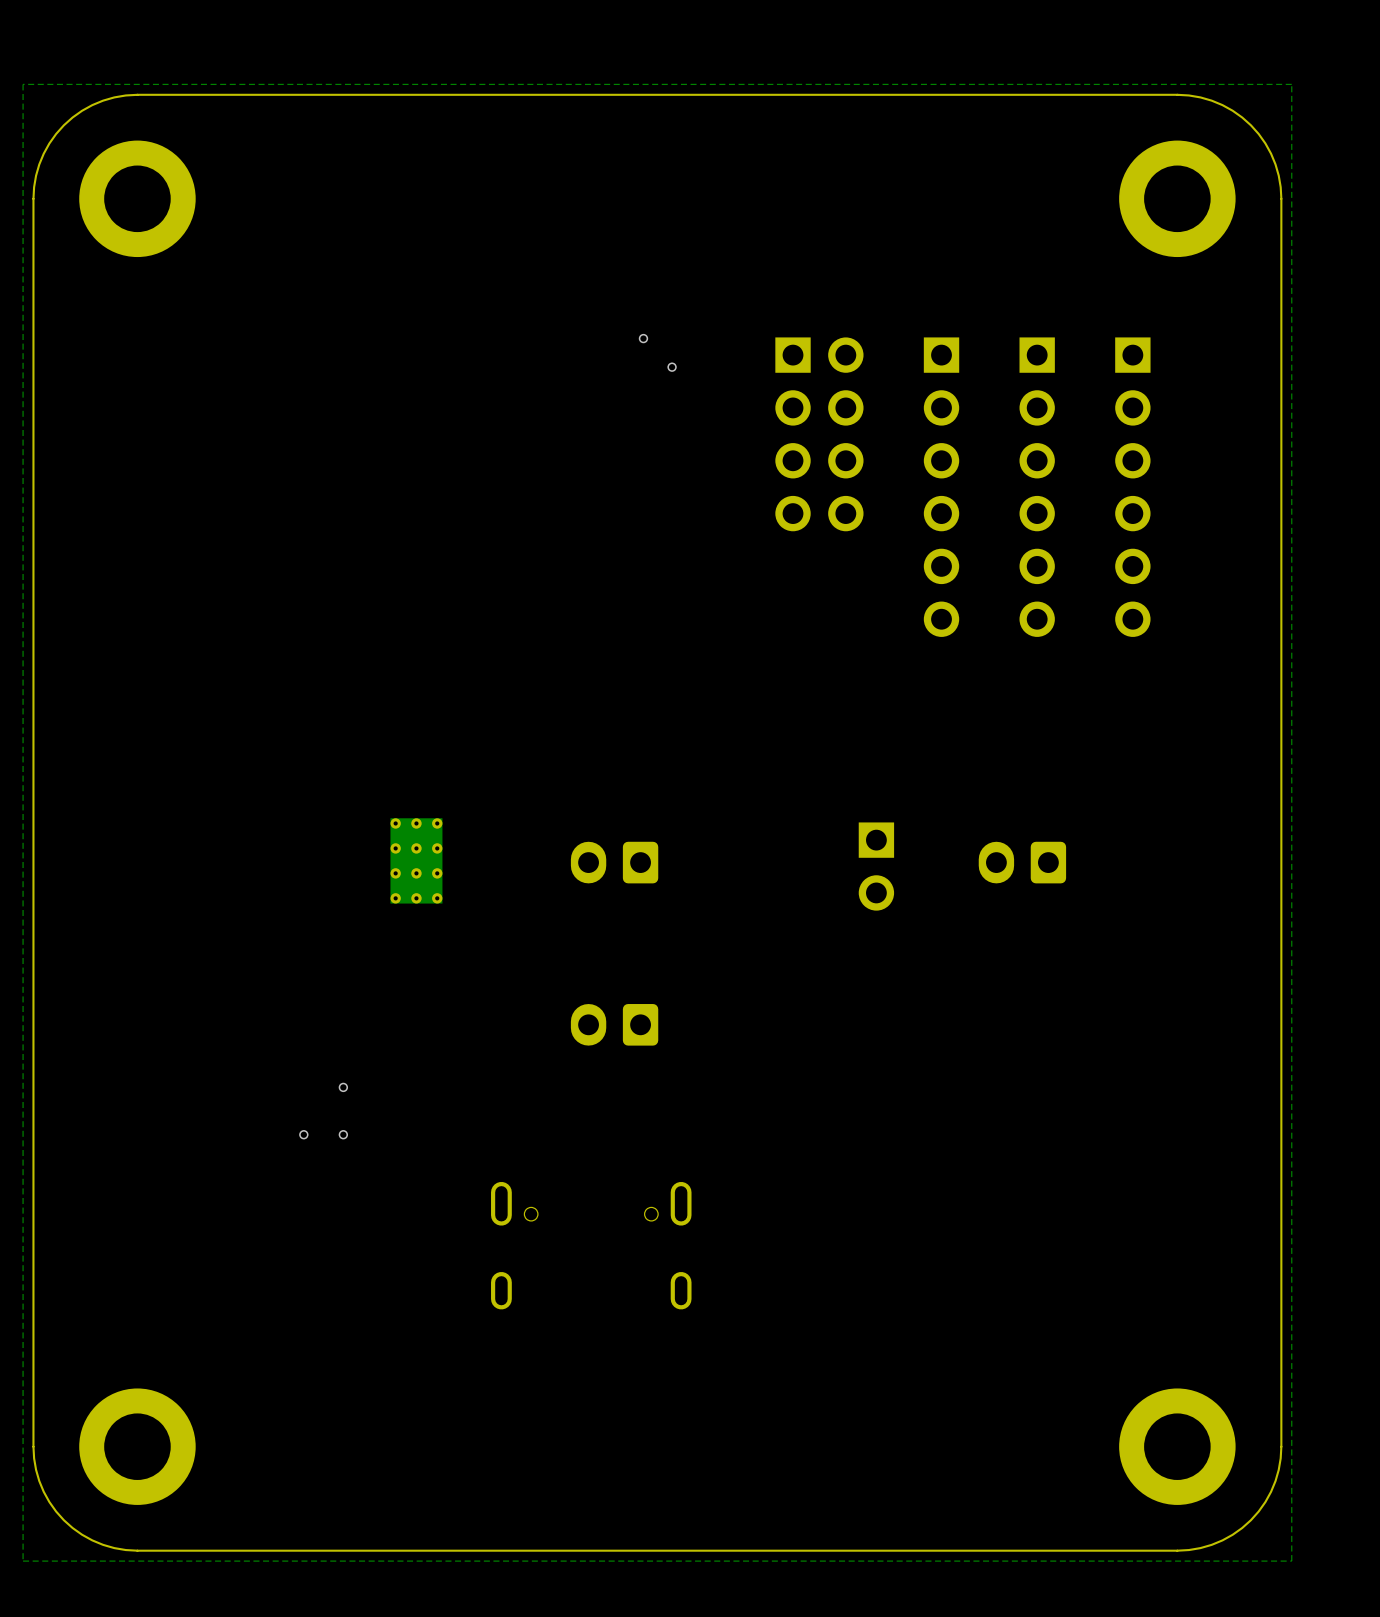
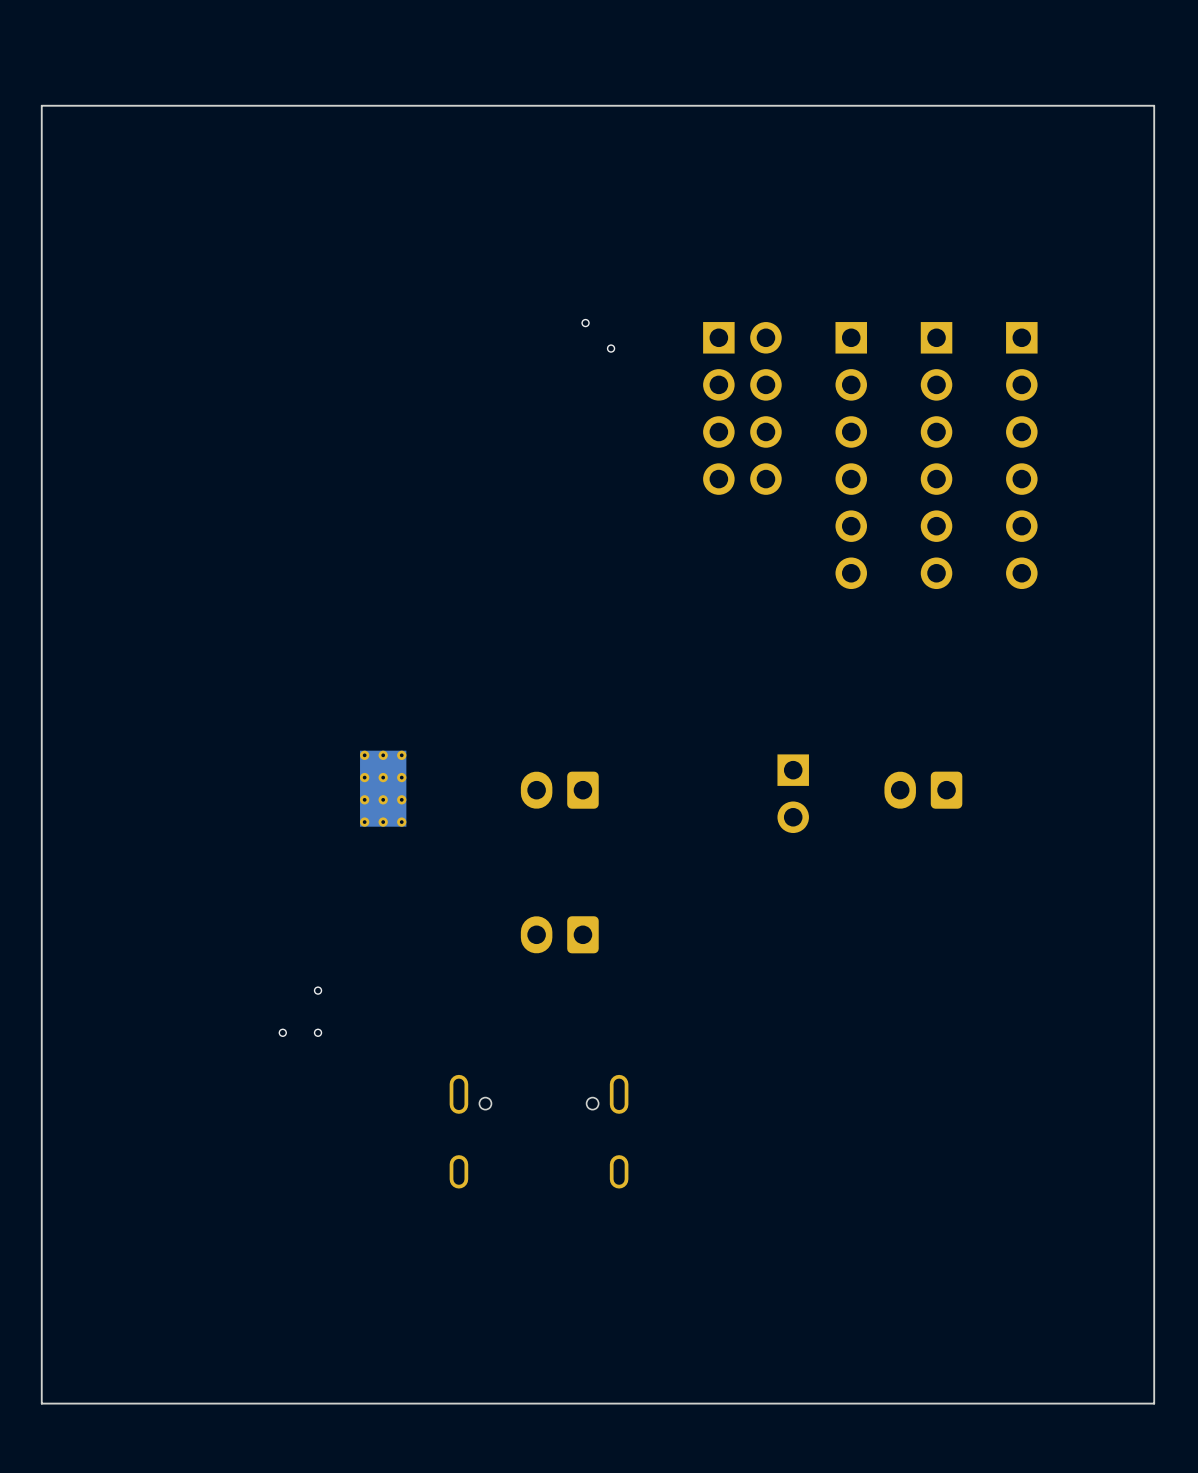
zone outline: (1291, 84) (23, 84) (23, 1561) (1291, 1561) (1291, 84) -> none
board edge: (137, 94) (114, 97) (92, 105) (63, 125) (49, 143) (39, 164) (33, 198) -> (134, 105) (41, 105) (41, 198)
board edge: (1177, 94) (1200, 97) (1222, 105) (1250, 125) (1265, 143) (1275, 164) (1281, 198) -> (1061, 105) (1154, 105) (1154, 198)
part: (137, 198) -> none
part: (1177, 198) -> none
board edge: (33, 1446) (39, 1481) (49, 1502) (63, 1520) (92, 1540) (114, 1548) (137, 1550) -> (41, 1310) (41, 1403) (134, 1403)
part: (137, 1446) -> none
part: (1177, 1446) -> none
board edge: (1281, 1446) (1275, 1481) (1265, 1502) (1250, 1520) (1232, 1534) (1211, 1544) (1177, 1550) -> (1154, 1310) (1154, 1403) (1061, 1403)

